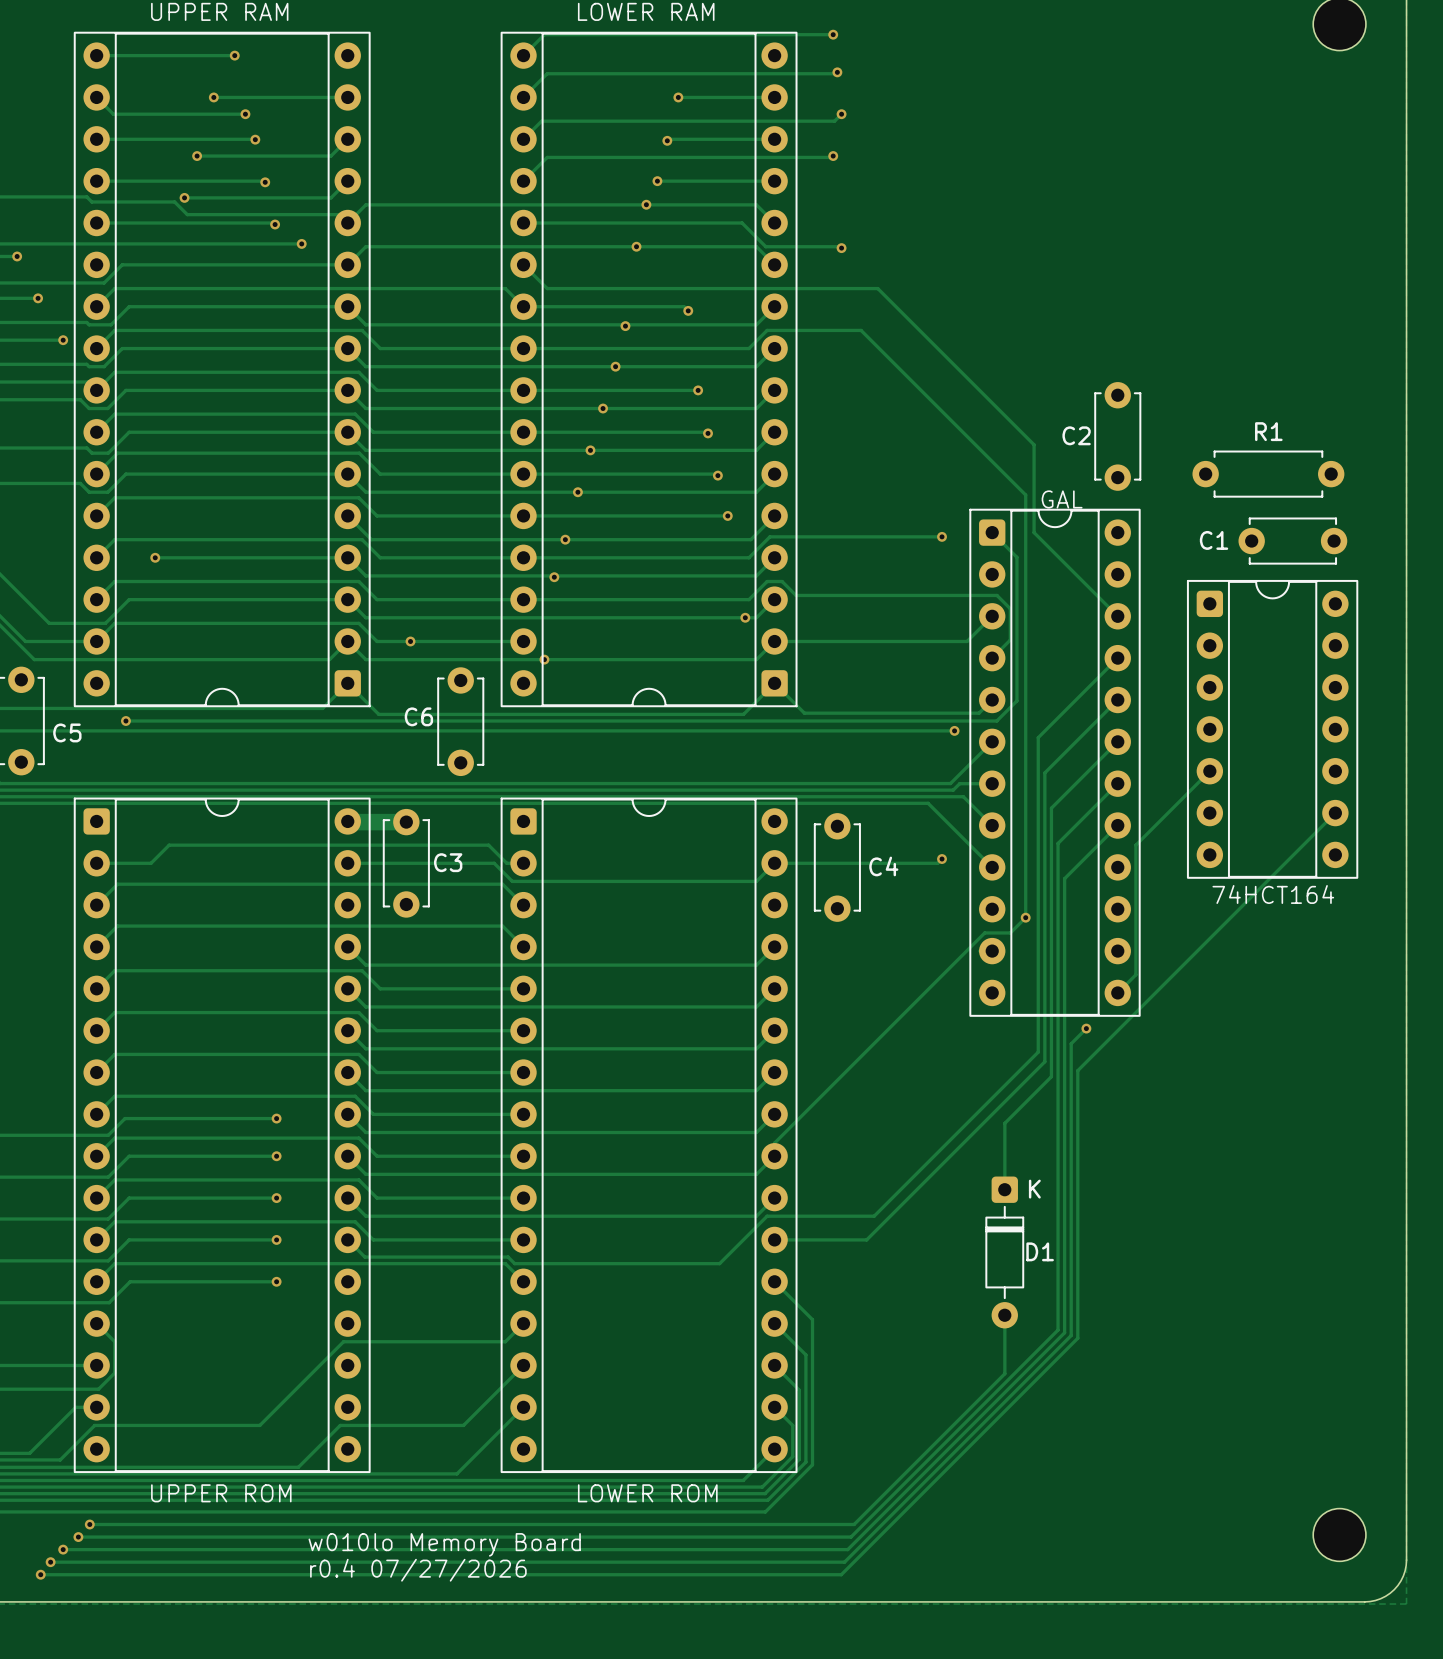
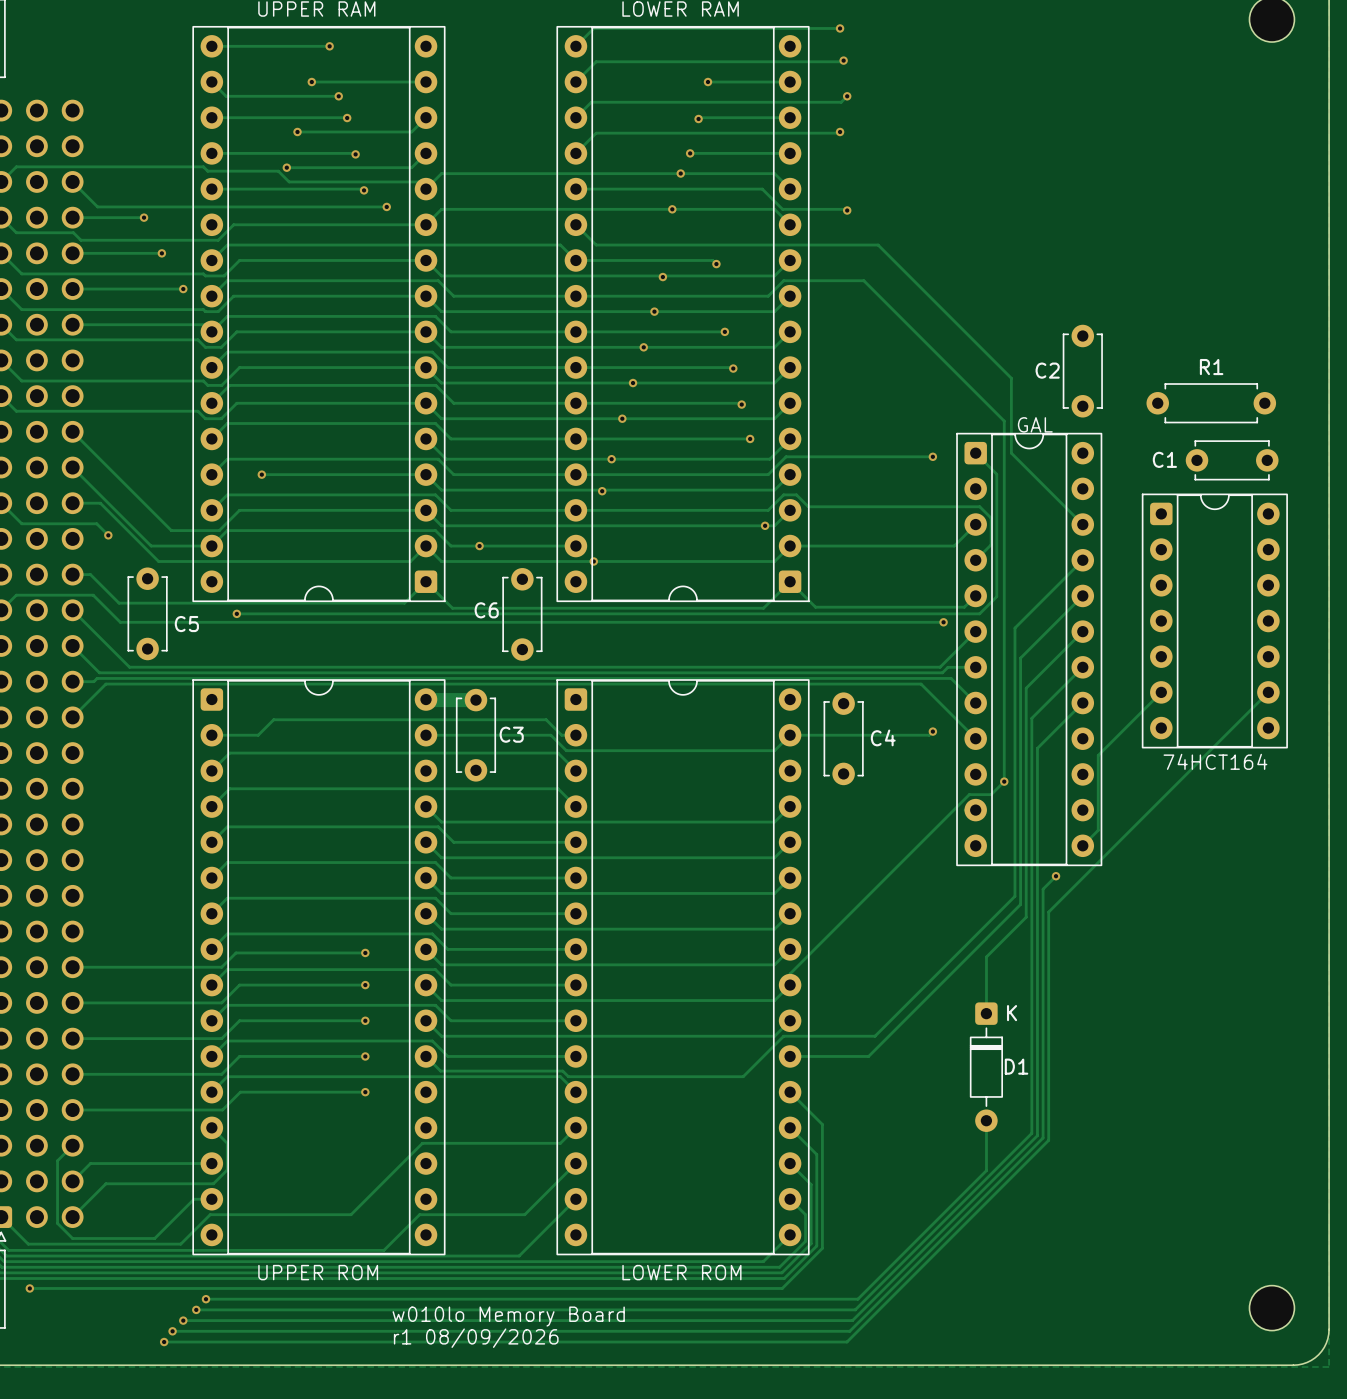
track: (1209, 771) (1135, 845) (1135, 887) -> (1161, 692) (1098, 755)
text: r0.4 07/27/2026 (418, 1570) -> r1 08/09/2026 (476, 1338)

